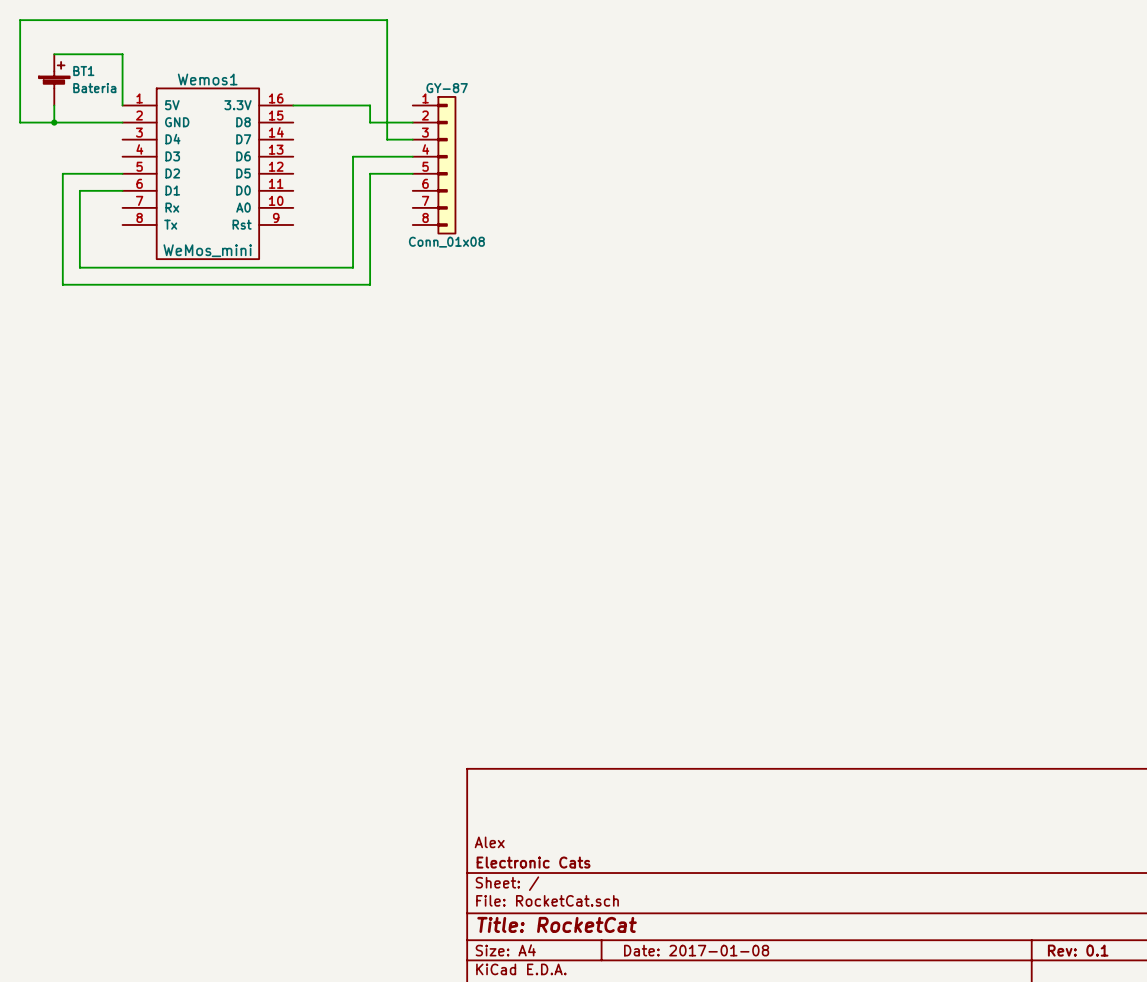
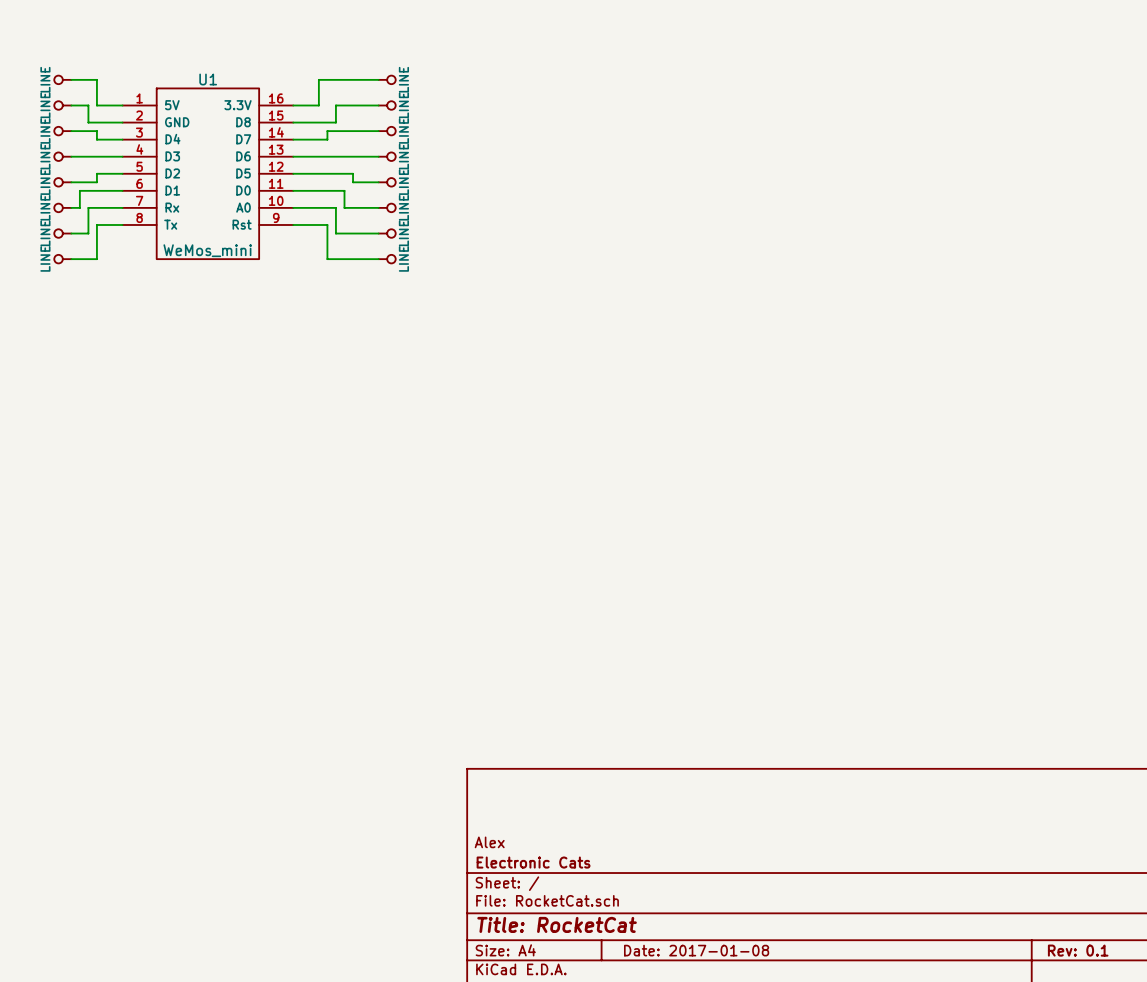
wire: (54, 54) (122, 54) (122, 105) -> (71, 79) (96, 79) (96, 105) (122, 105)
BT1: Bateria (54, 79) -> none
power symbol: none -> LINE (62, 79)
Wemos1 name: Wemos1 (207, 79) -> U1 (208, 79)
wire: none -> (378, 79) (318, 79) (318, 105)
power symbol: none -> LINE (387, 79)
wire: (54, 105) (54, 122) -> none
power symbol: none -> LINE (62, 105)
wire: (318, 105) (335, 105) -> (293, 122) (335, 122) (335, 105)
wire: (370, 105) (370, 122) (412, 122) -> (370, 105) (378, 105)
power symbol: none -> LINE (387, 105)
junction: (54, 122) -> none
wire: (88, 122) (20, 122) (20, 20) (387, 20) (387, 139) (412, 139) -> (88, 122) (88, 105) (71, 105)
power symbol: none -> LINE (62, 131)
wire: none -> (71, 131) (96, 131) (96, 139) (122, 139)
wire: none -> (378, 131) (327, 131) (327, 139) (293, 139)
power symbol: none -> LINE (387, 131)
power symbol: none -> LINE (62, 156)
wire: none -> (71, 156) (122, 156)
wire: (353, 156) (353, 173) -> (353, 156) (293, 156)
power symbol: none -> LINE (387, 156)
GY-87: Conn_01x08 (434, 165) -> none
wire: (96, 173) (62, 173) (62, 284) (370, 284) (370, 173) (412, 173) -> (96, 173) (96, 182) (71, 182)
wire: none -> (293, 173) (353, 173)
power symbol: none -> LINE (62, 182)
wire: (353, 182) (353, 267) (79, 267) (79, 207) -> (71, 207) (79, 207)
wire: none -> (353, 182) (378, 182)
power symbol: none -> LINE (387, 182)
wire: none -> (293, 190) (344, 190) (344, 207) (378, 207)
power symbol: none -> LINE (62, 207)
wire: none -> (122, 207) (88, 207) (88, 233) (71, 233)
wire: none -> (293, 207) (335, 207) (335, 233) (378, 233)
power symbol: none -> LINE (387, 207)
wire: none -> (122, 224) (96, 224) (96, 259) (71, 259)
wire: none -> (293, 224) (327, 224) (327, 259) (378, 259)
power symbol: none -> LINE (62, 233)
power symbol: none -> LINE (387, 233)
power symbol: none -> LINE (62, 259)
power symbol: none -> LINE (387, 259)

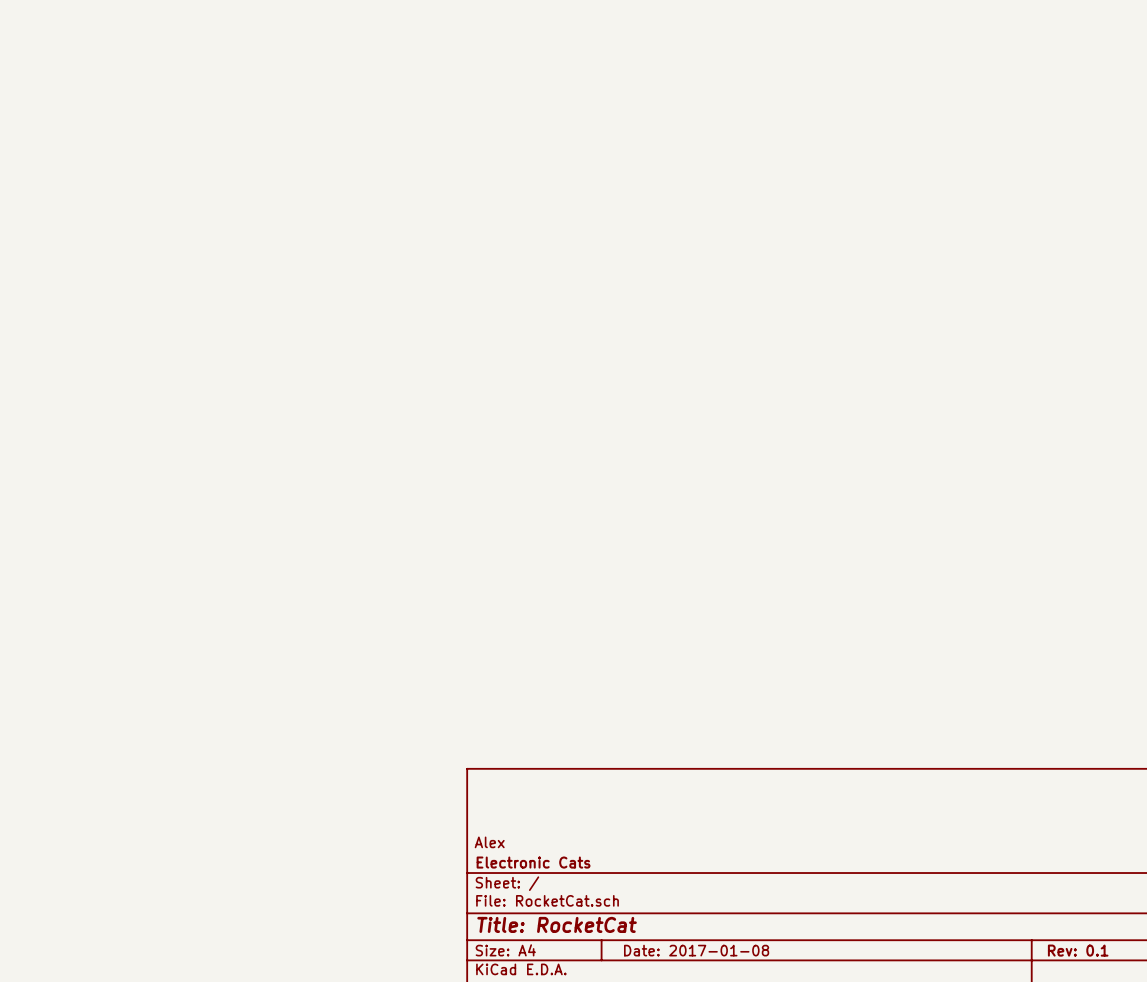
power symbol: LINE (62, 79) -> none
wire: (71, 79) (96, 79) (96, 105) (122, 105) -> none
wire: (378, 79) (318, 79) (318, 105) (293, 105) -> none
power symbol: LINE (387, 79) -> none
power symbol: LINE (62, 105) -> none
wire: (71, 105) (88, 105) (88, 122) (122, 122) -> none
wire: (378, 105) (335, 105) (335, 122) (293, 122) -> none
power symbol: LINE (387, 105) -> none
power symbol: LINE (62, 131) -> none
wire: (71, 131) (96, 131) (96, 139) (122, 139) -> none
wire: (378, 131) (327, 131) (327, 139) (293, 139) -> none
power symbol: LINE (387, 131) -> none
power symbol: LINE (62, 156) -> none
wire: (71, 156) (122, 156) -> none
wire: (293, 156) (378, 156) -> none
power symbol: LINE (387, 156) -> none
wire: (122, 173) (96, 173) (96, 182) (71, 182) -> none
U1: WeMos_mini (207, 173) -> none
wire: (293, 173) (353, 173) (353, 182) (378, 182) -> none
power symbol: LINE (62, 182) -> none
power symbol: LINE (387, 182) -> none
wire: (122, 190) (79, 190) (79, 207) (71, 207) -> none
wire: (293, 190) (344, 190) (344, 207) (378, 207) -> none
power symbol: LINE (62, 207) -> none
wire: (122, 207) (88, 207) (88, 233) (71, 233) -> none
wire: (293, 207) (335, 207) (335, 233) (378, 233) -> none
power symbol: LINE (387, 207) -> none
wire: (122, 224) (96, 224) (96, 259) (71, 259) -> none
wire: (293, 224) (327, 224) (327, 259) (378, 259) -> none
power symbol: LINE (62, 233) -> none
power symbol: LINE (387, 233) -> none
power symbol: LINE (62, 259) -> none
power symbol: LINE (387, 259) -> none

